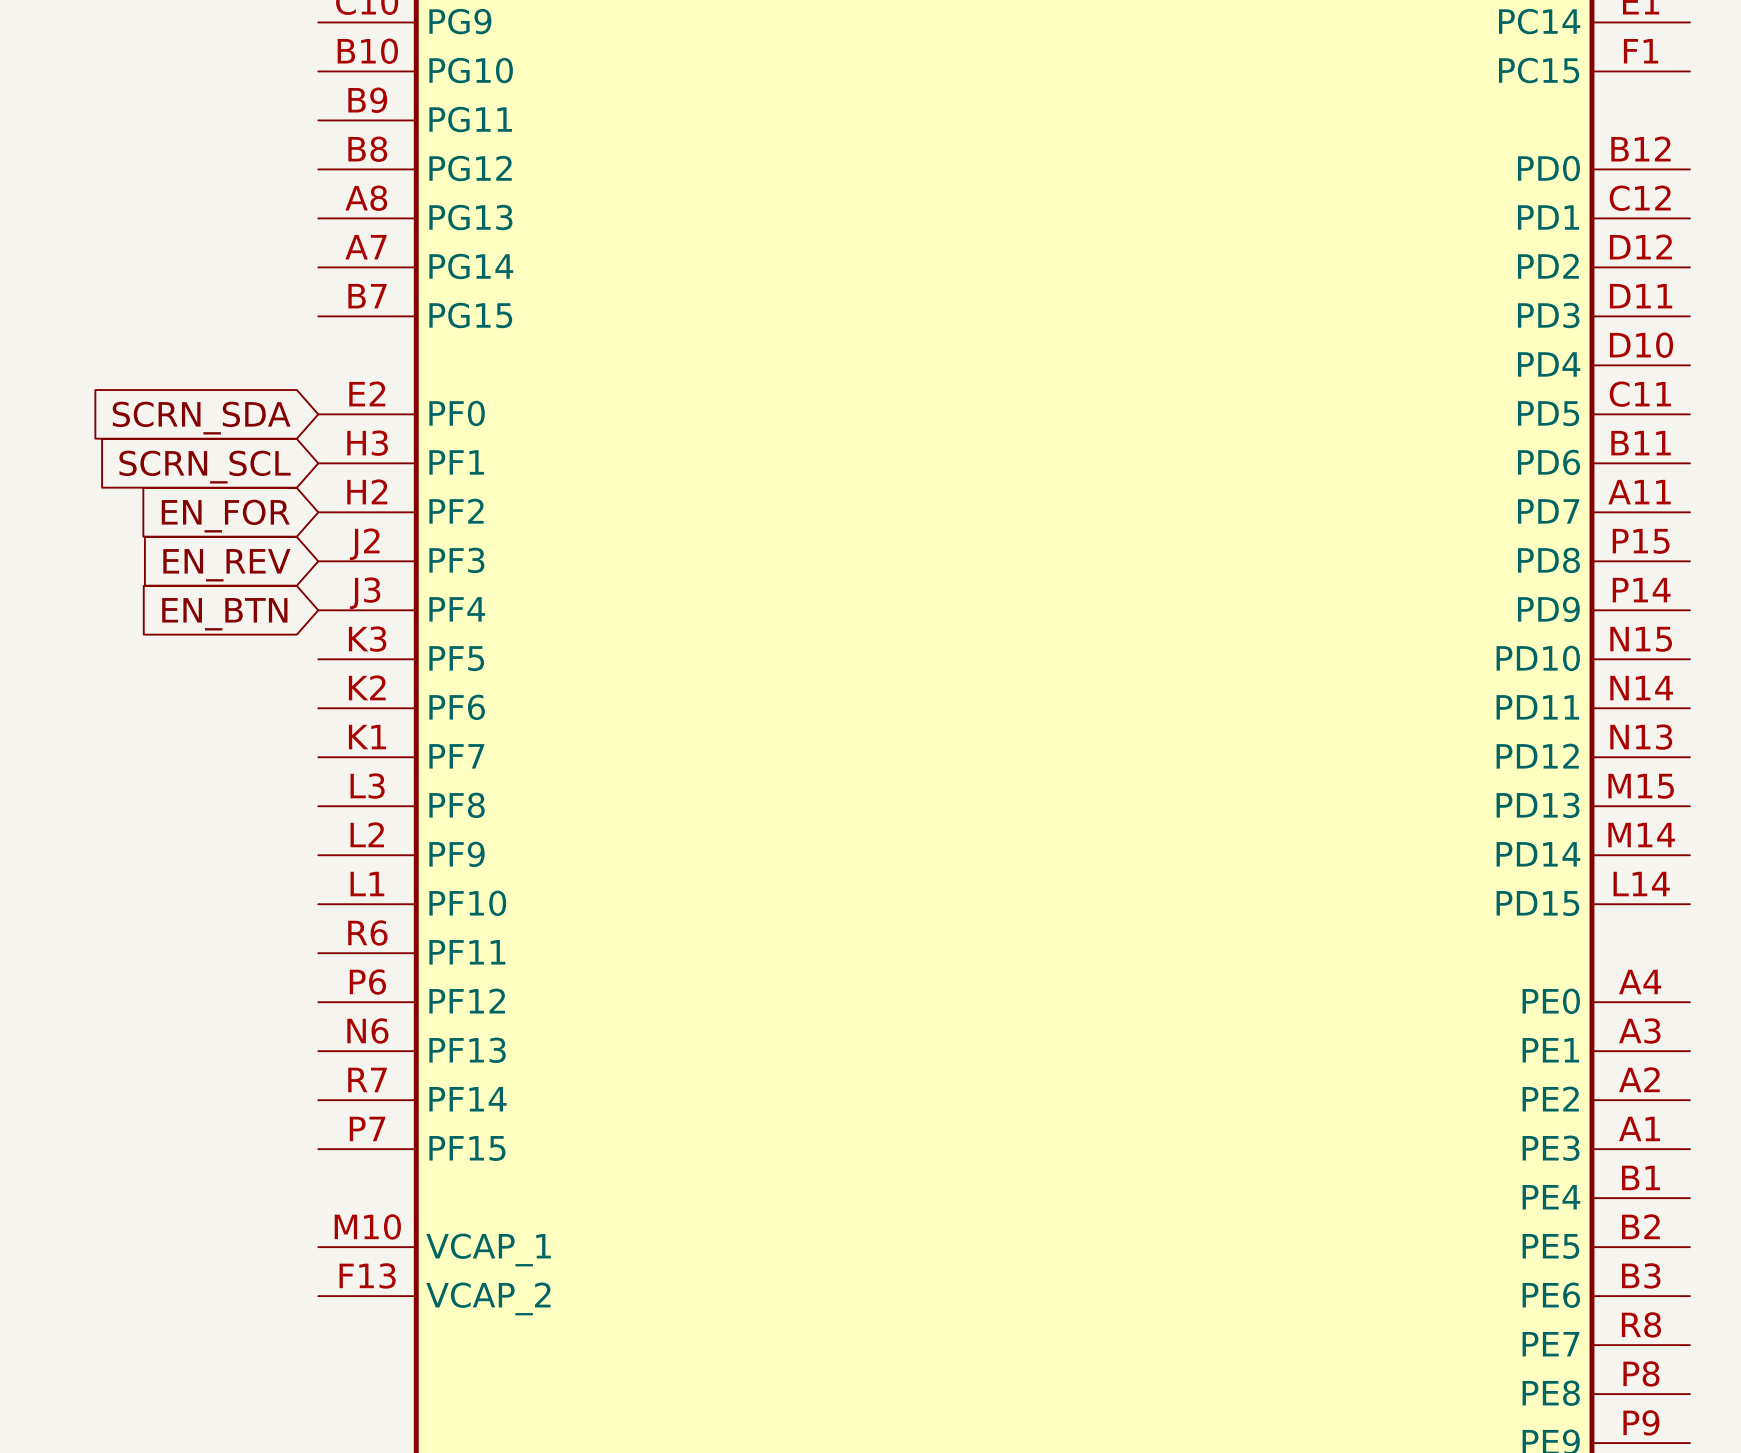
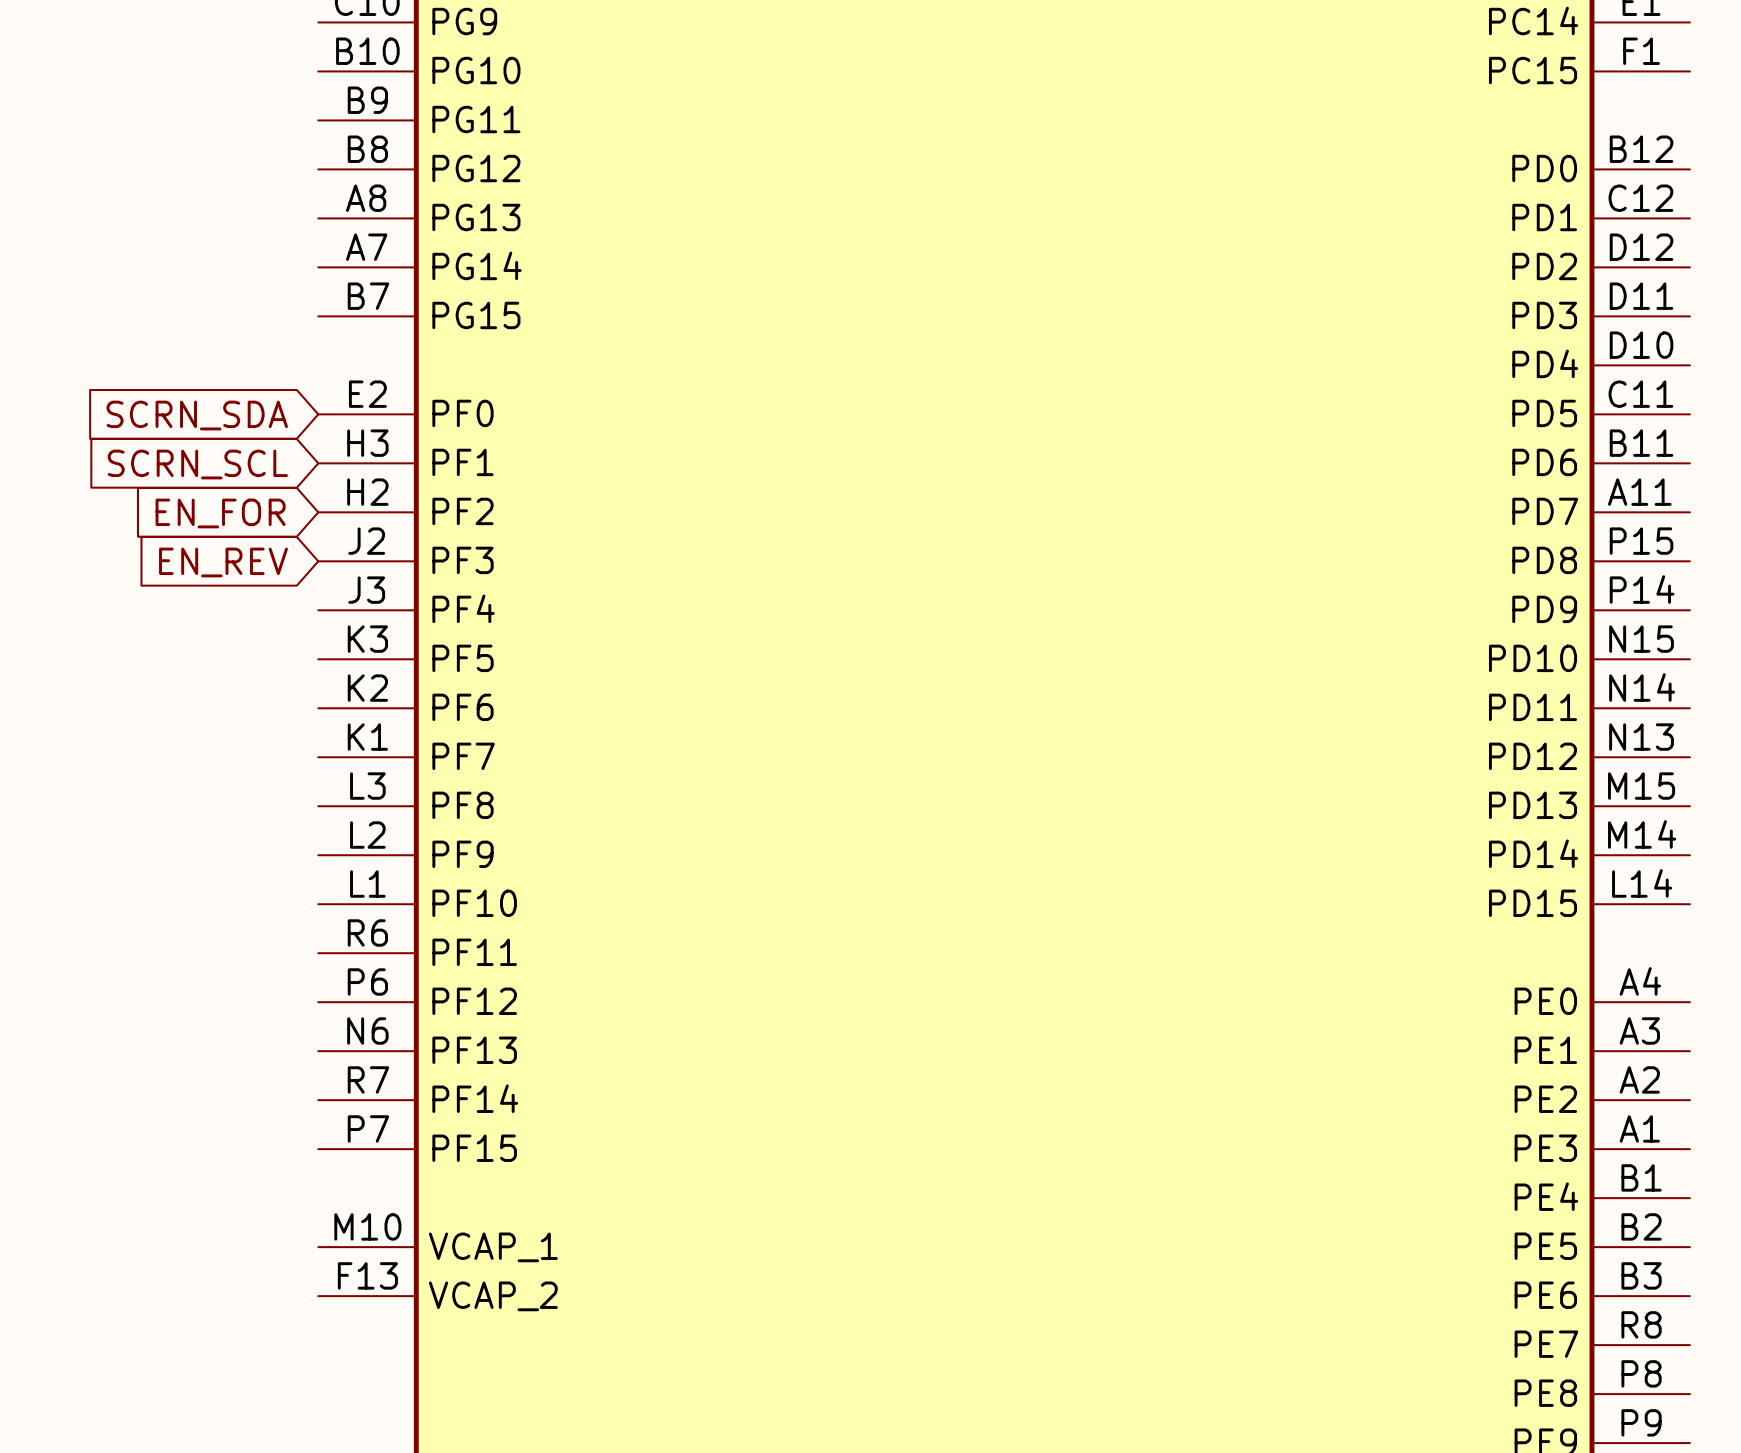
global label: EN_BTN (224, 614) -> none

